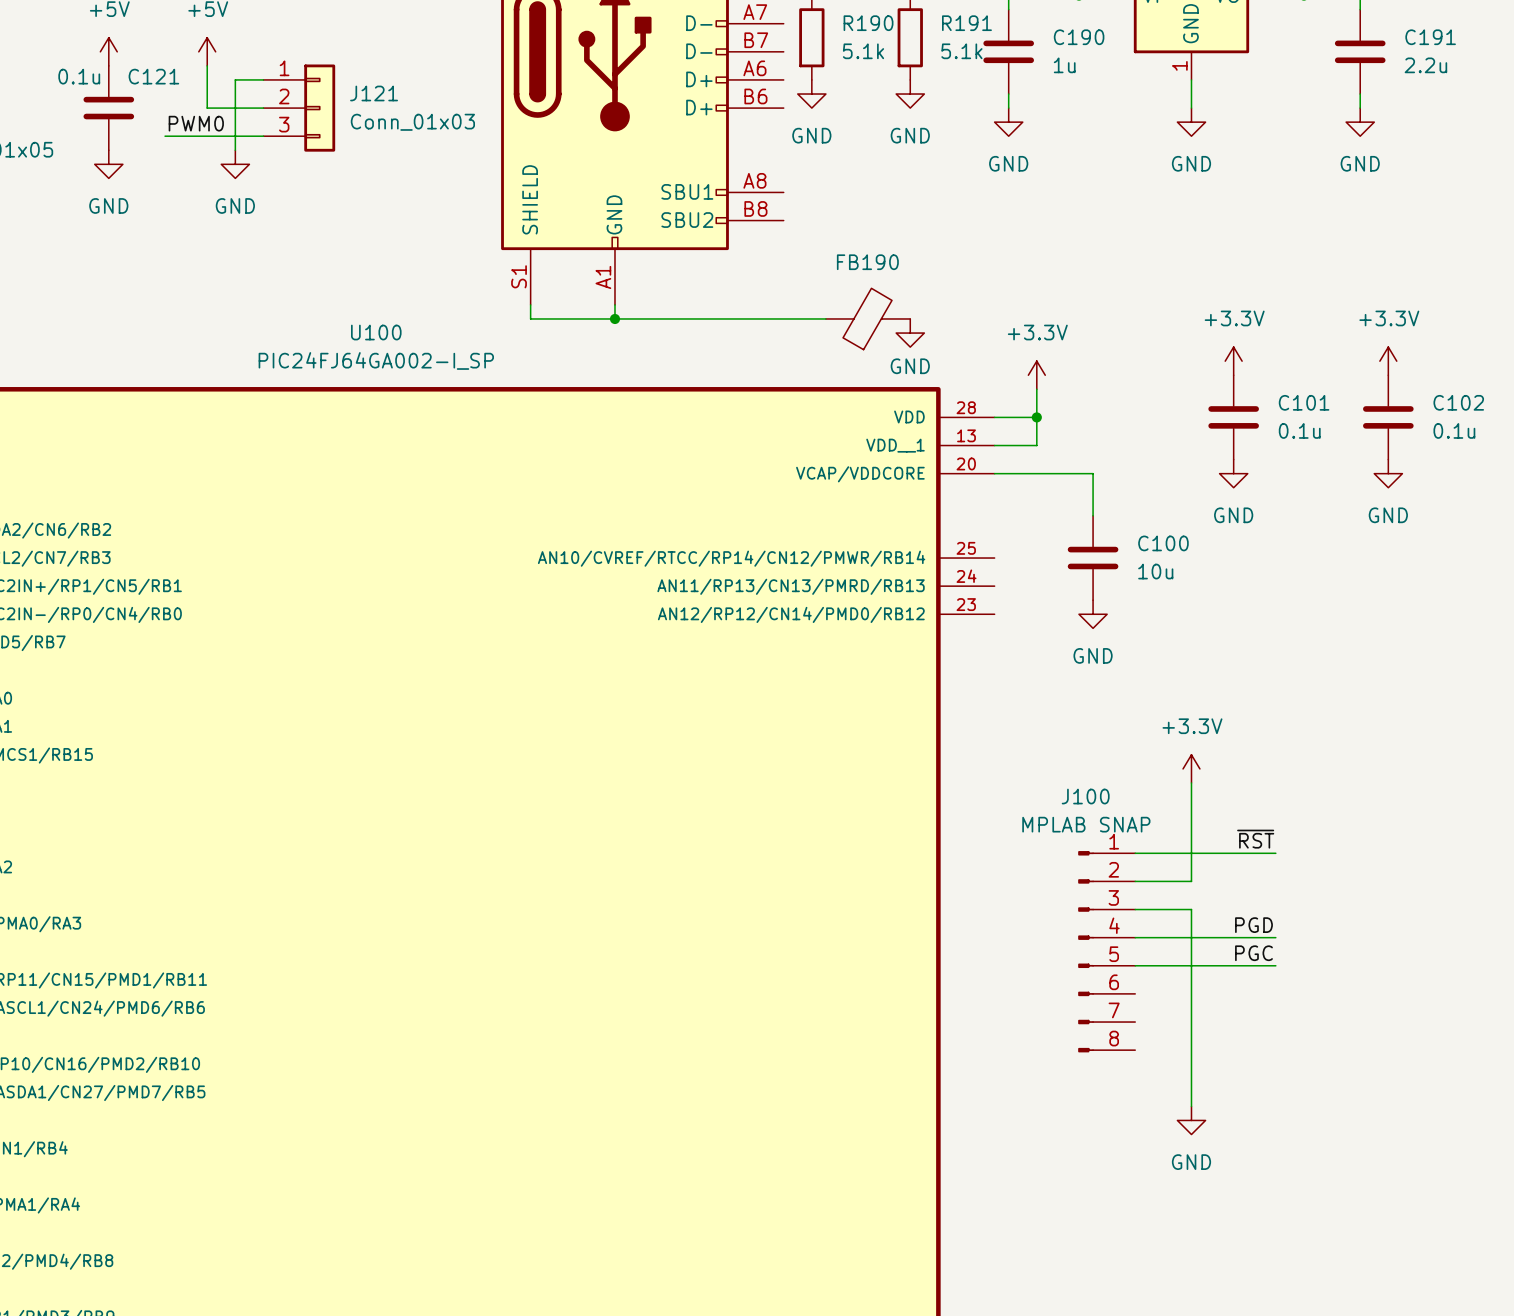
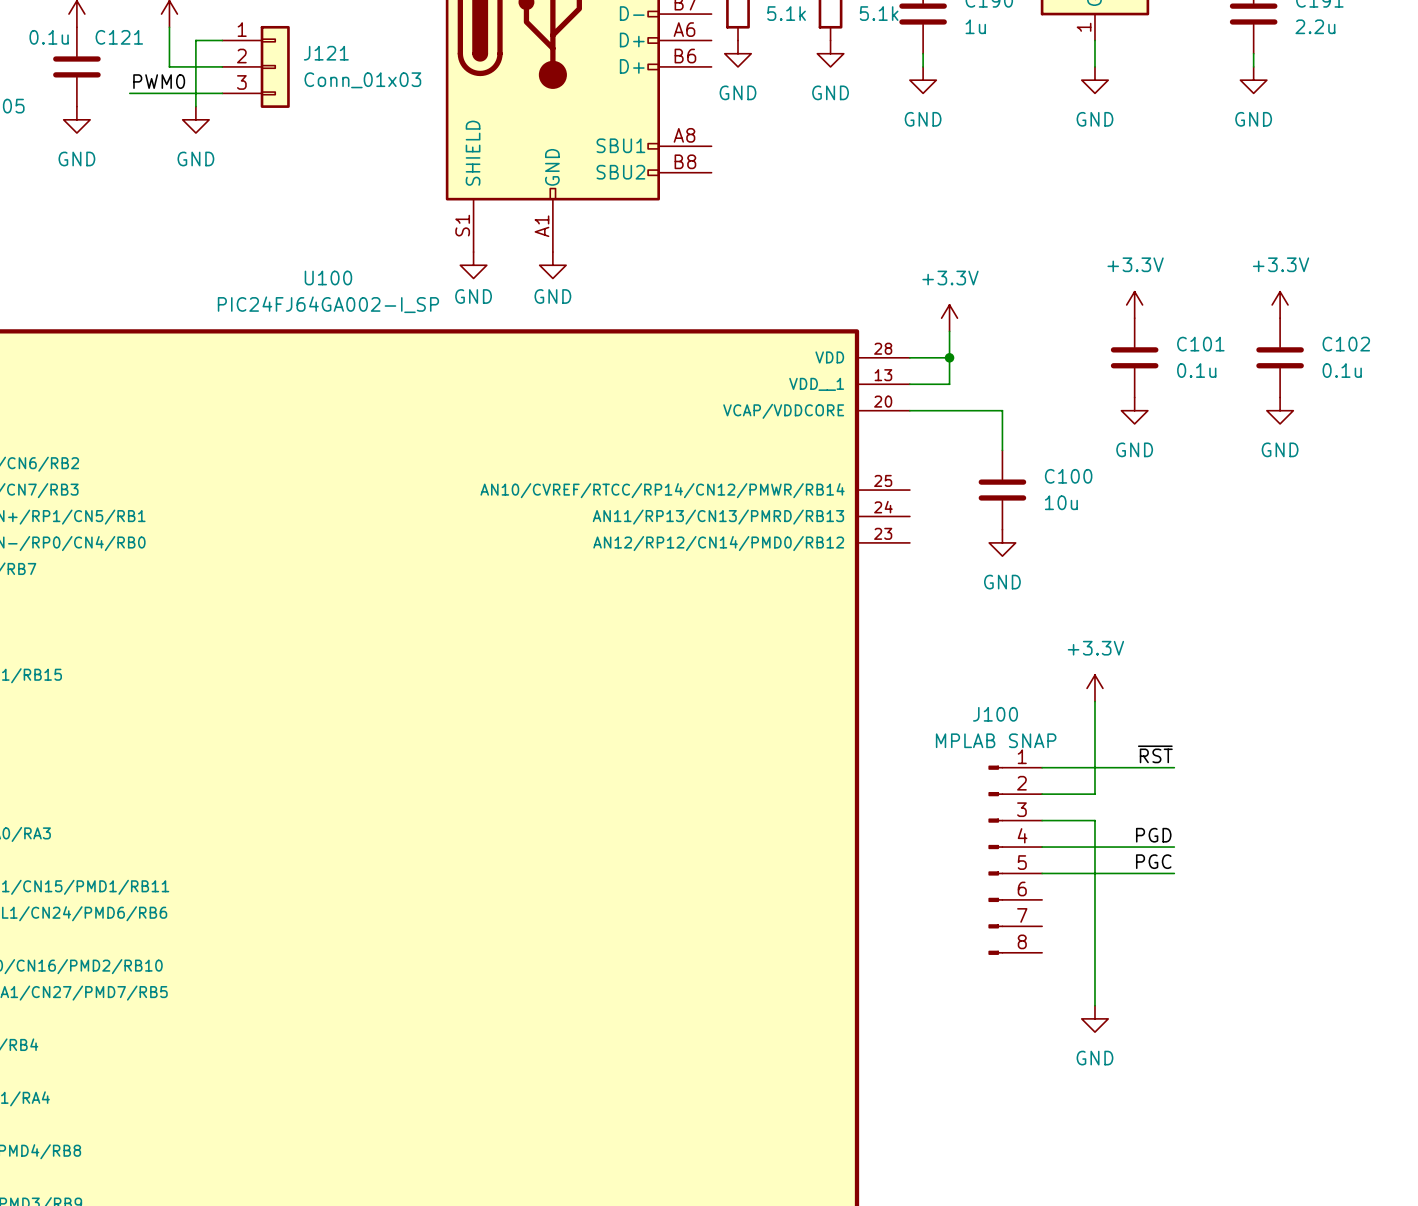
wire: (530, 304) (530, 318) (825, 318) -> none
power symbol: none -> GND (473, 265)
junction: (614, 318) -> none
power symbol: none -> GND (552, 265)
FB190: (868, 318) -> none
power symbol: GND (910, 333) -> none

